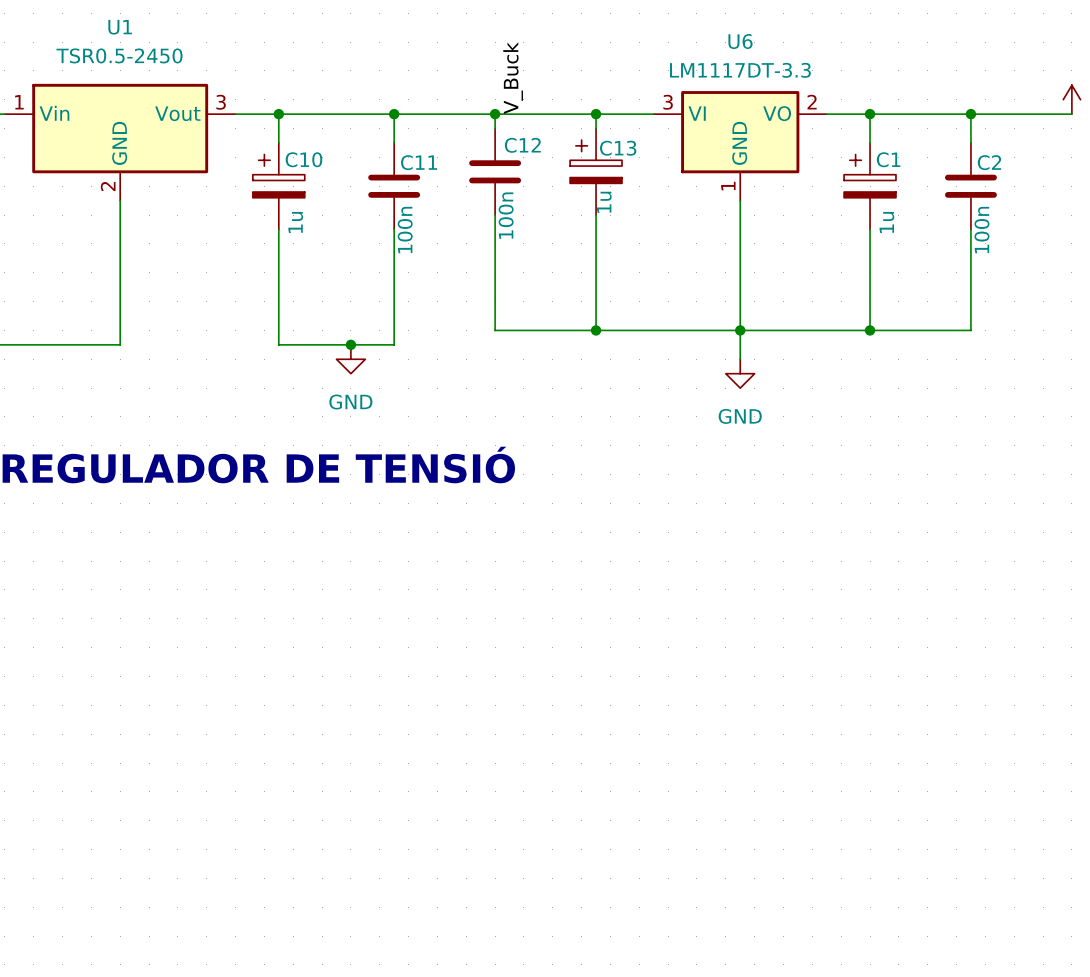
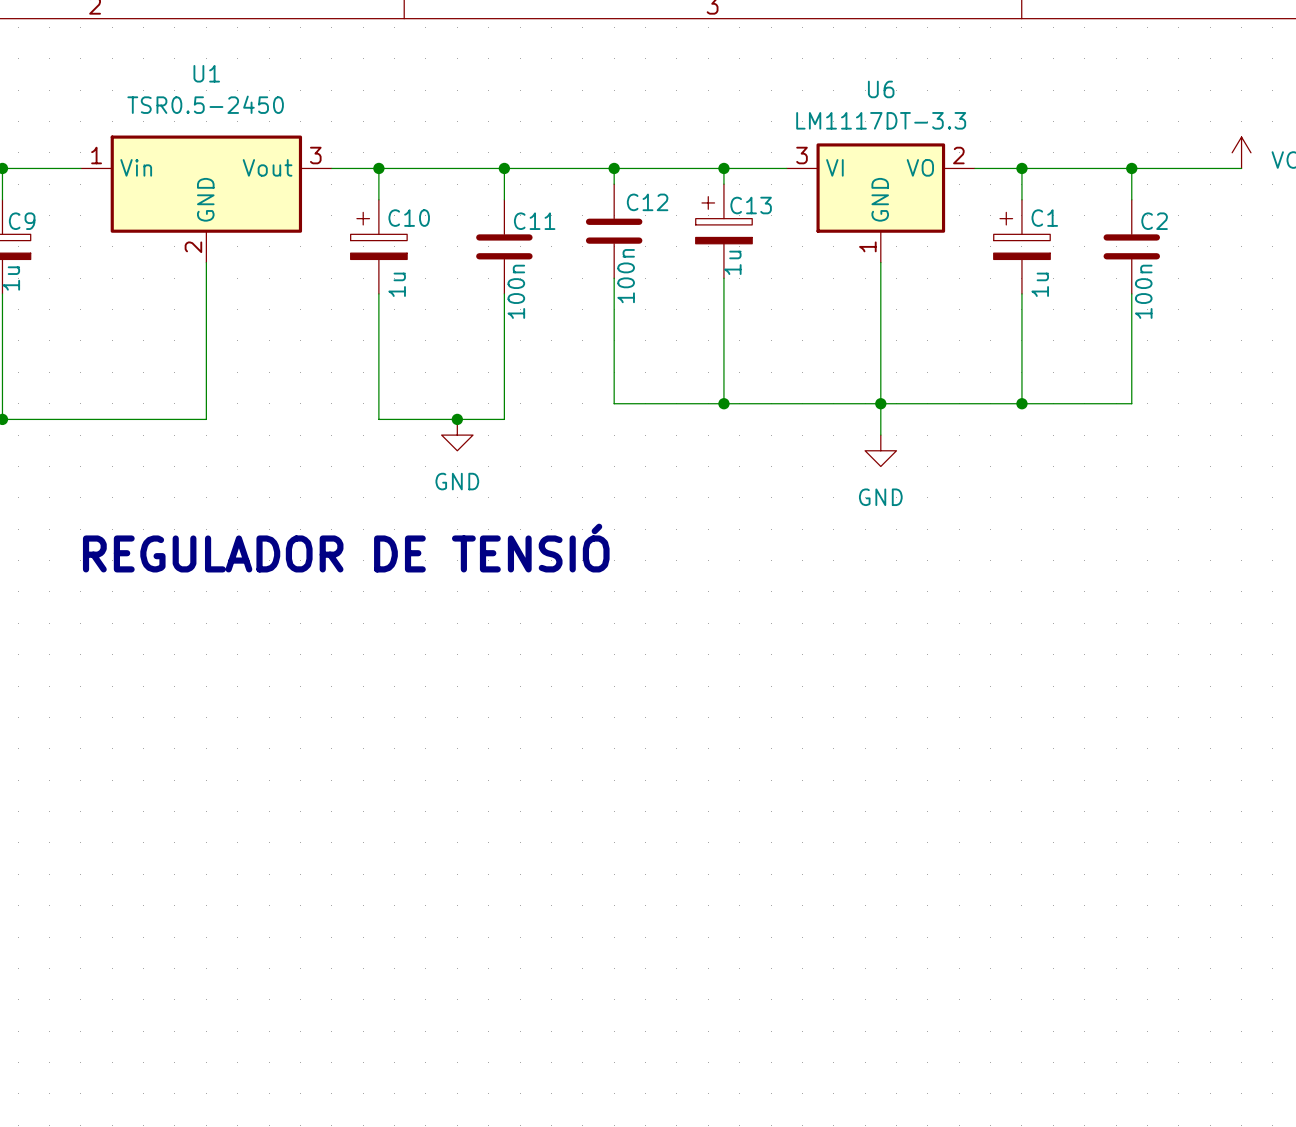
label: V_Buck (513, 78) -> none

